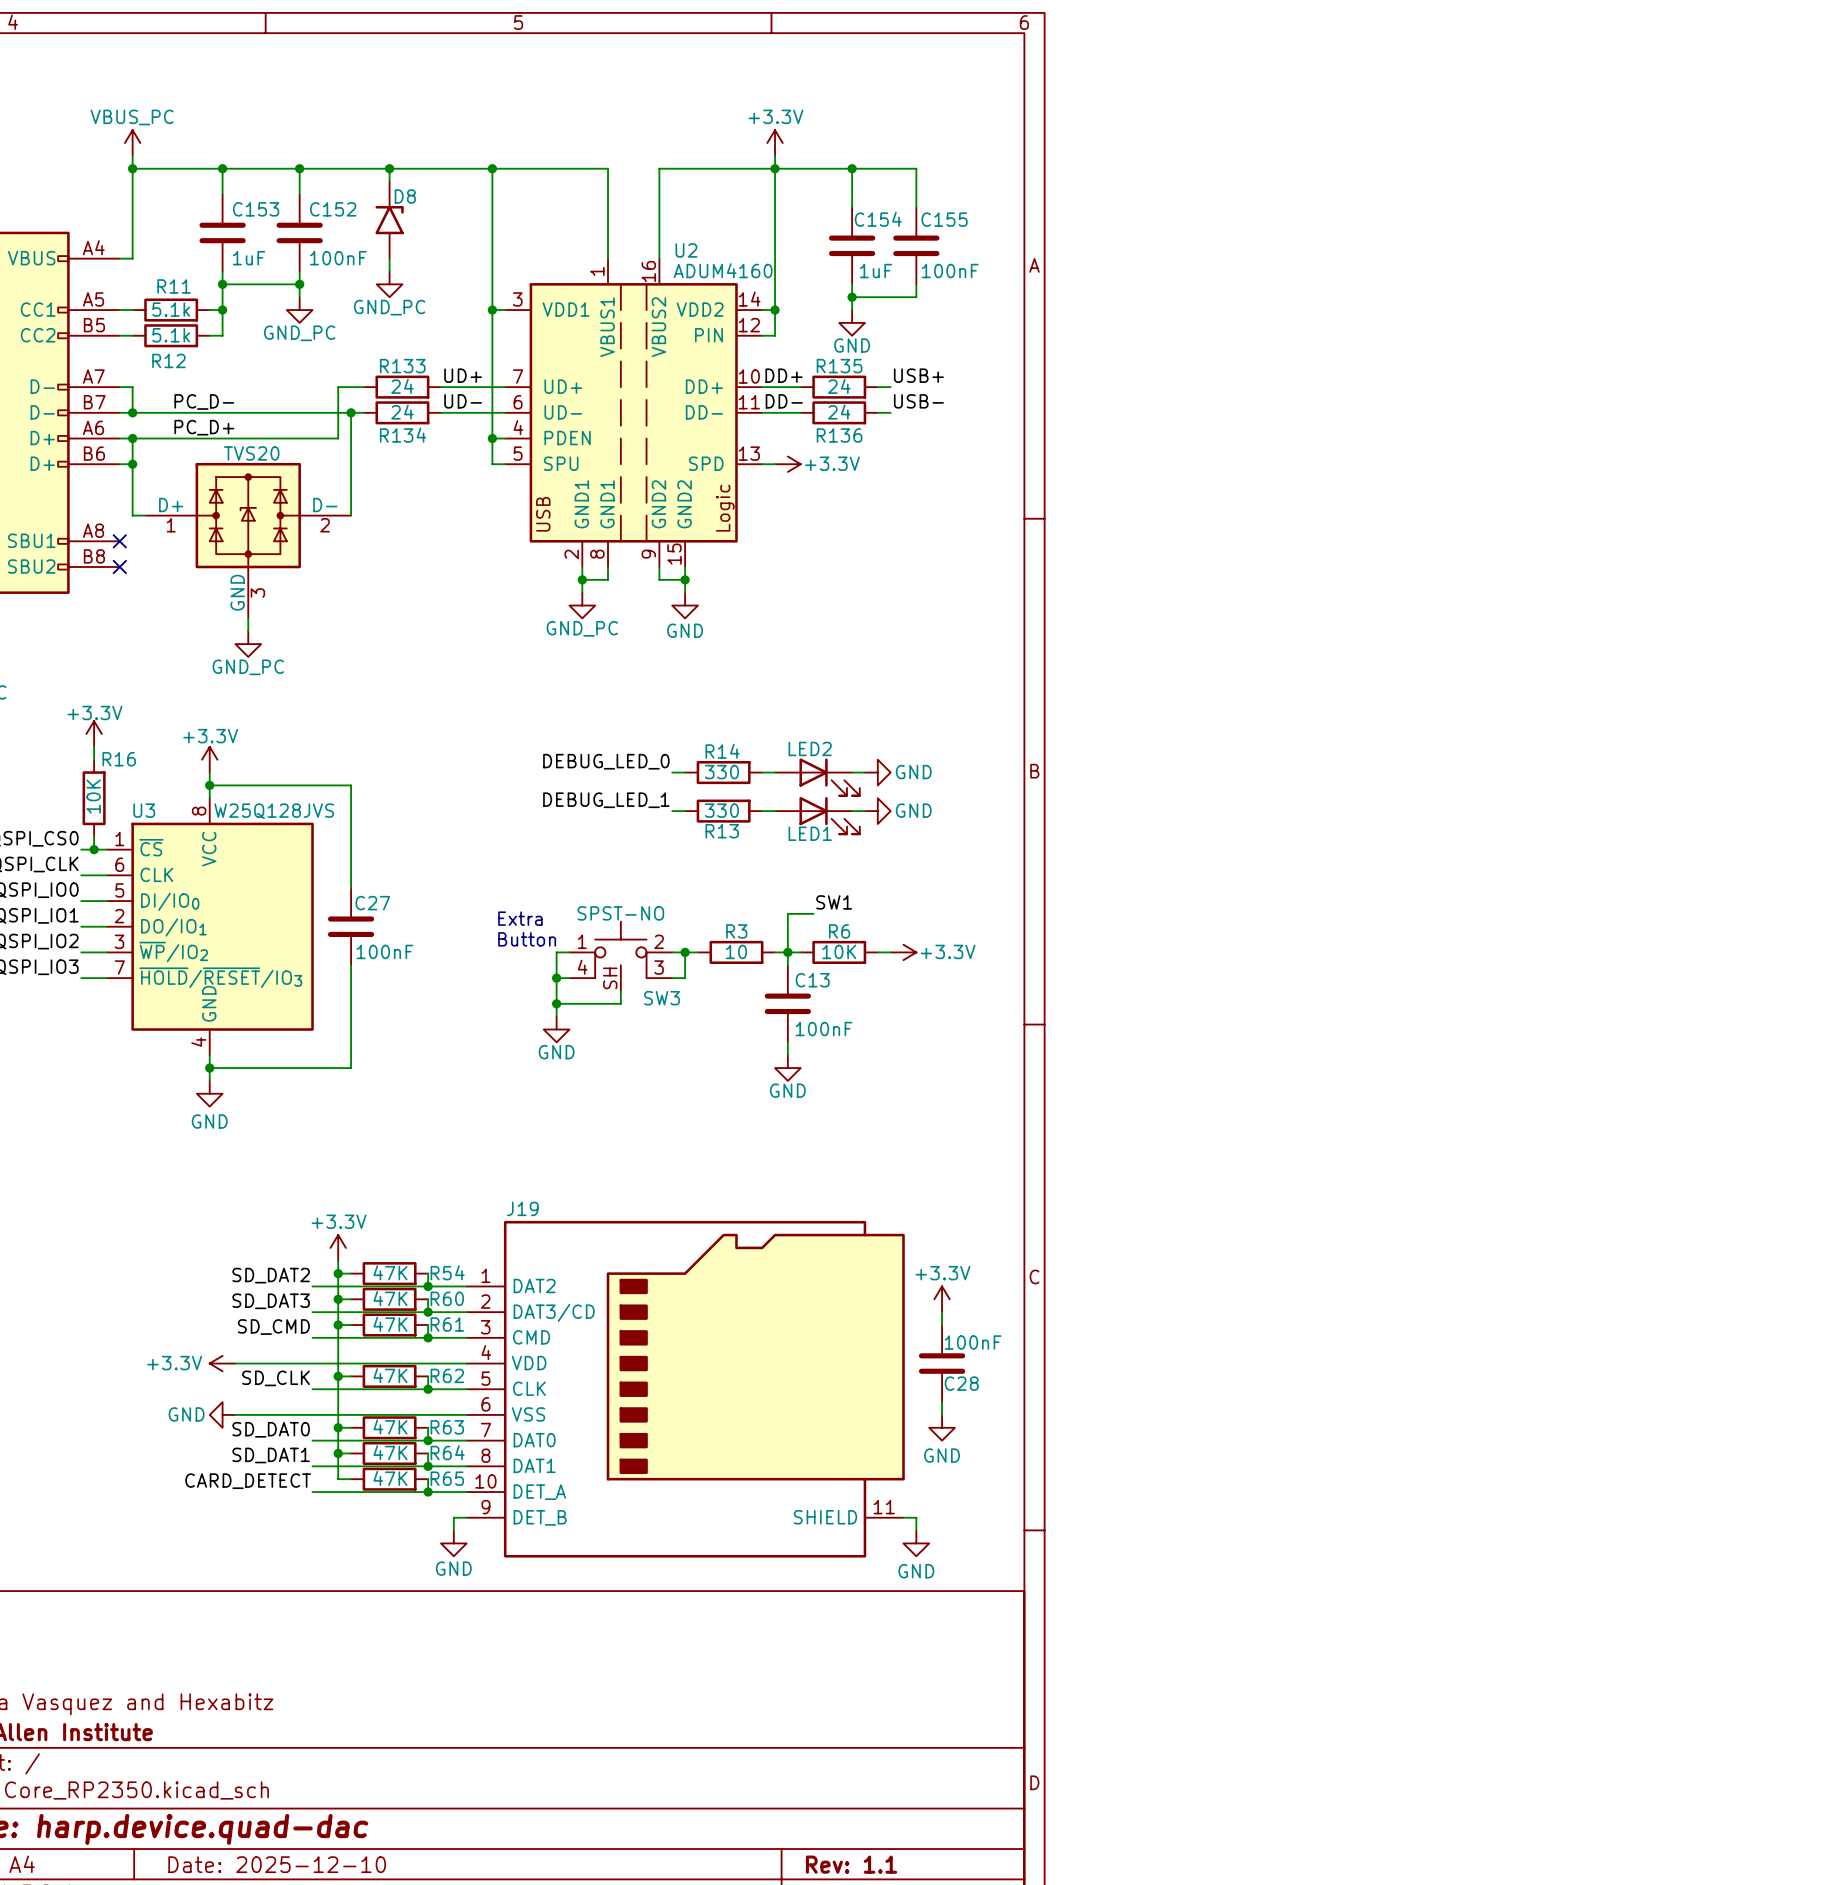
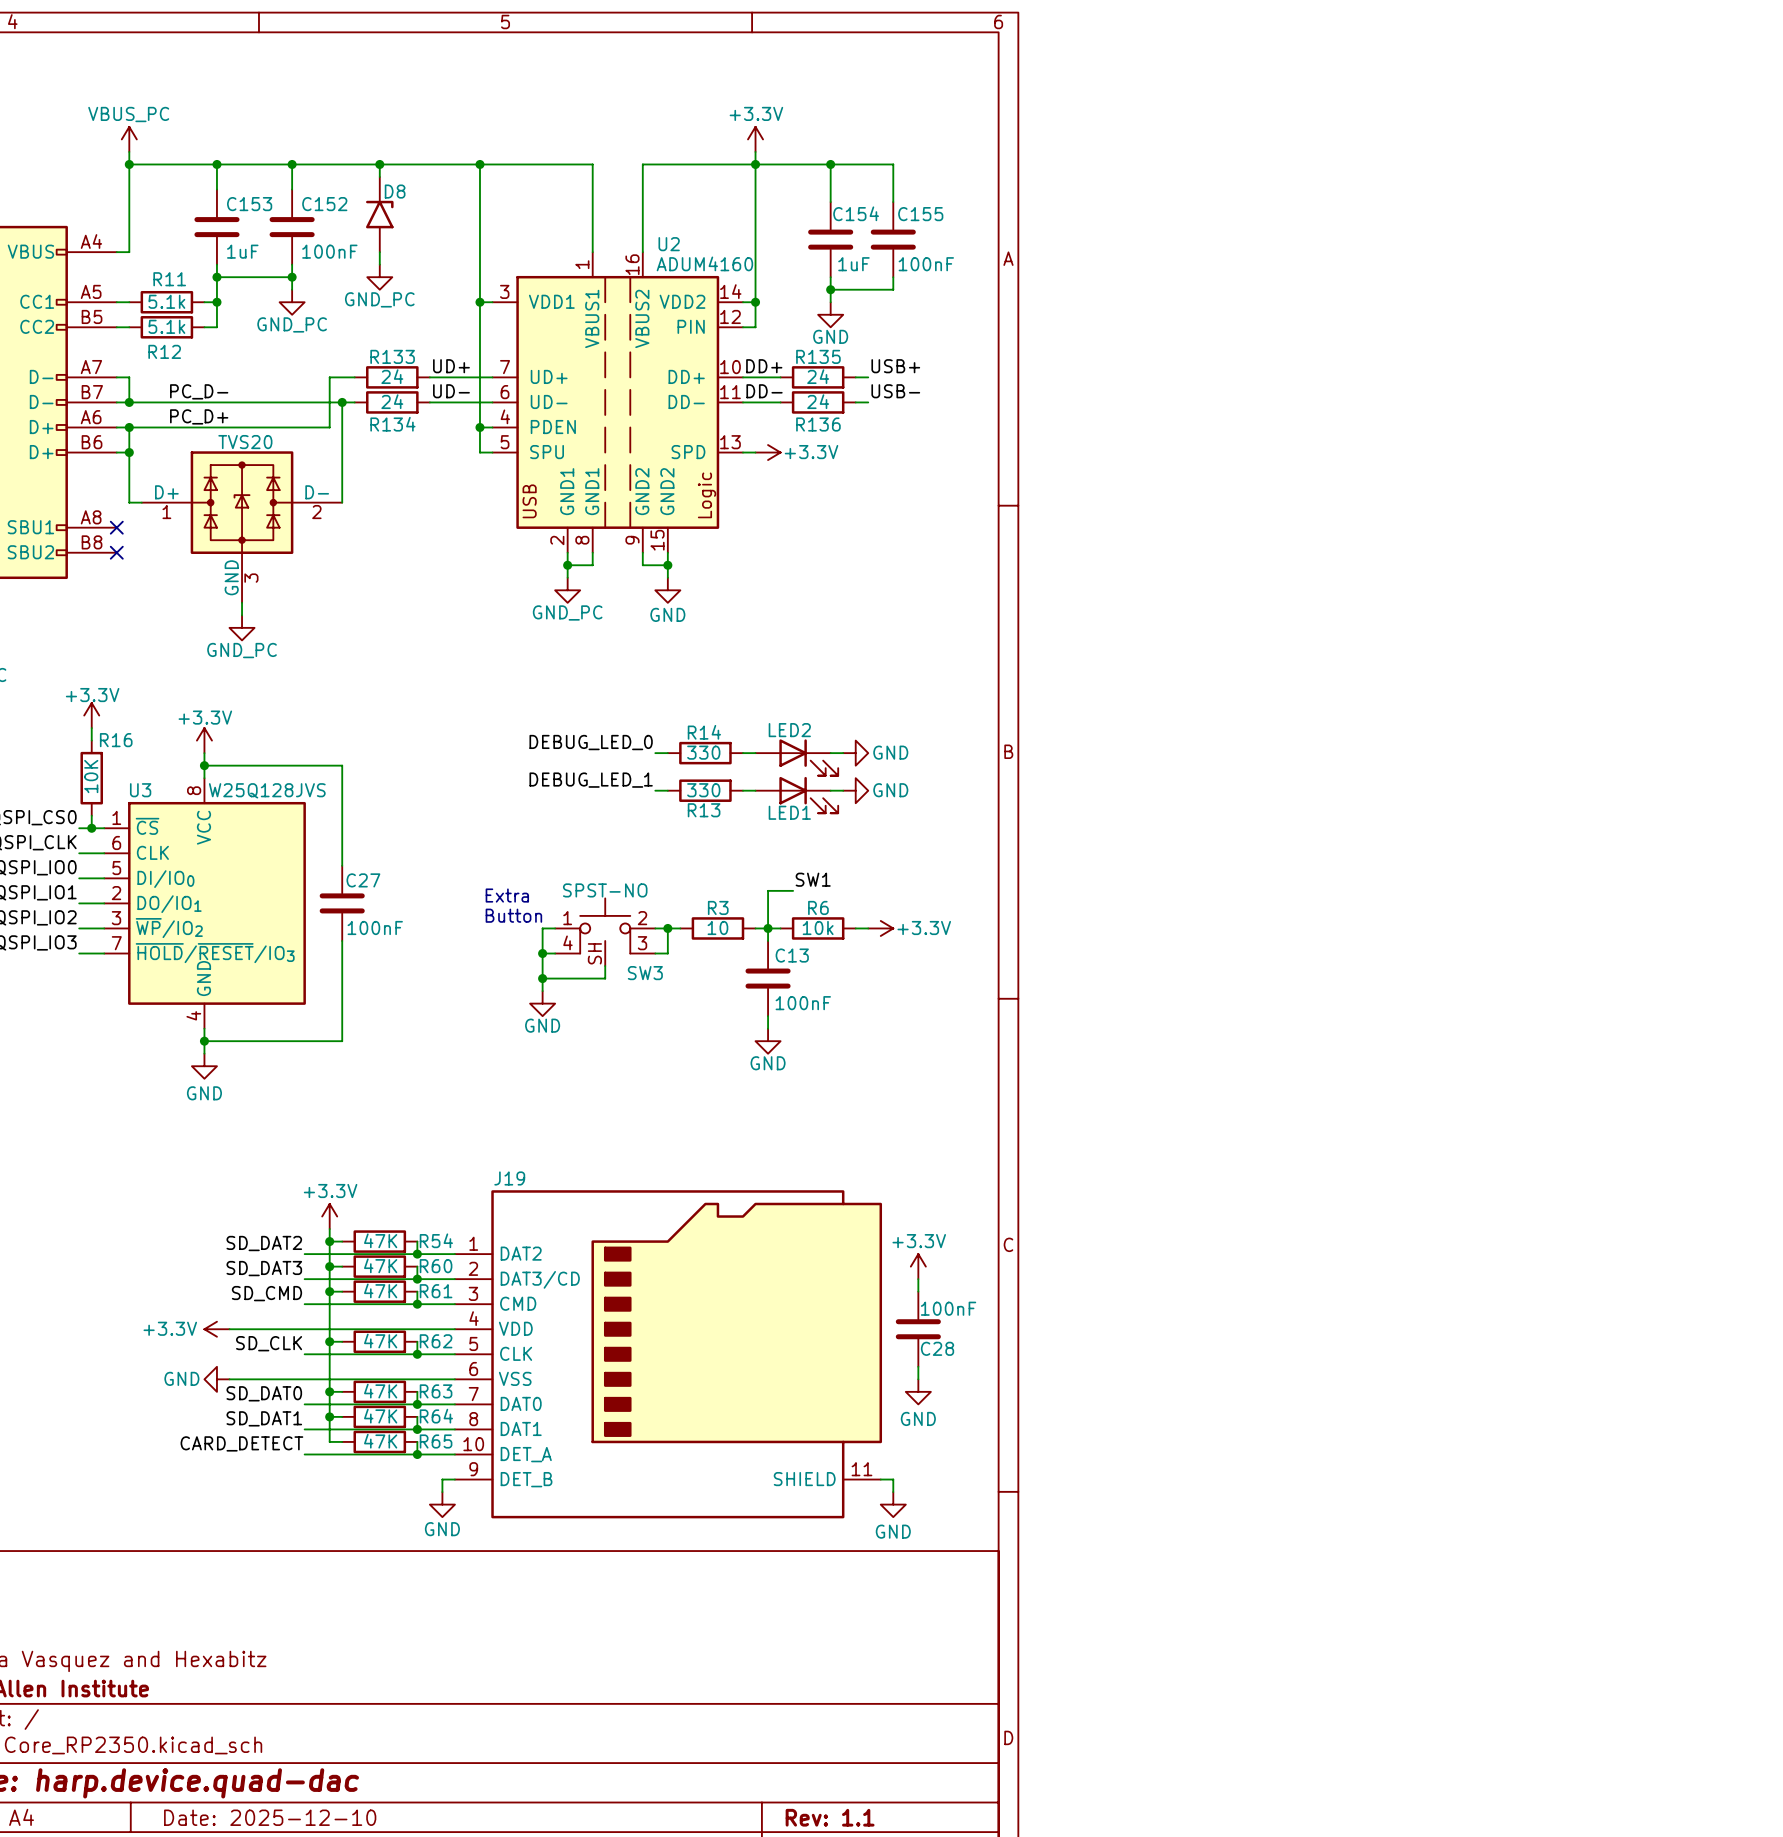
R6 value: 10K (839, 951) -> 10k (818, 927)

